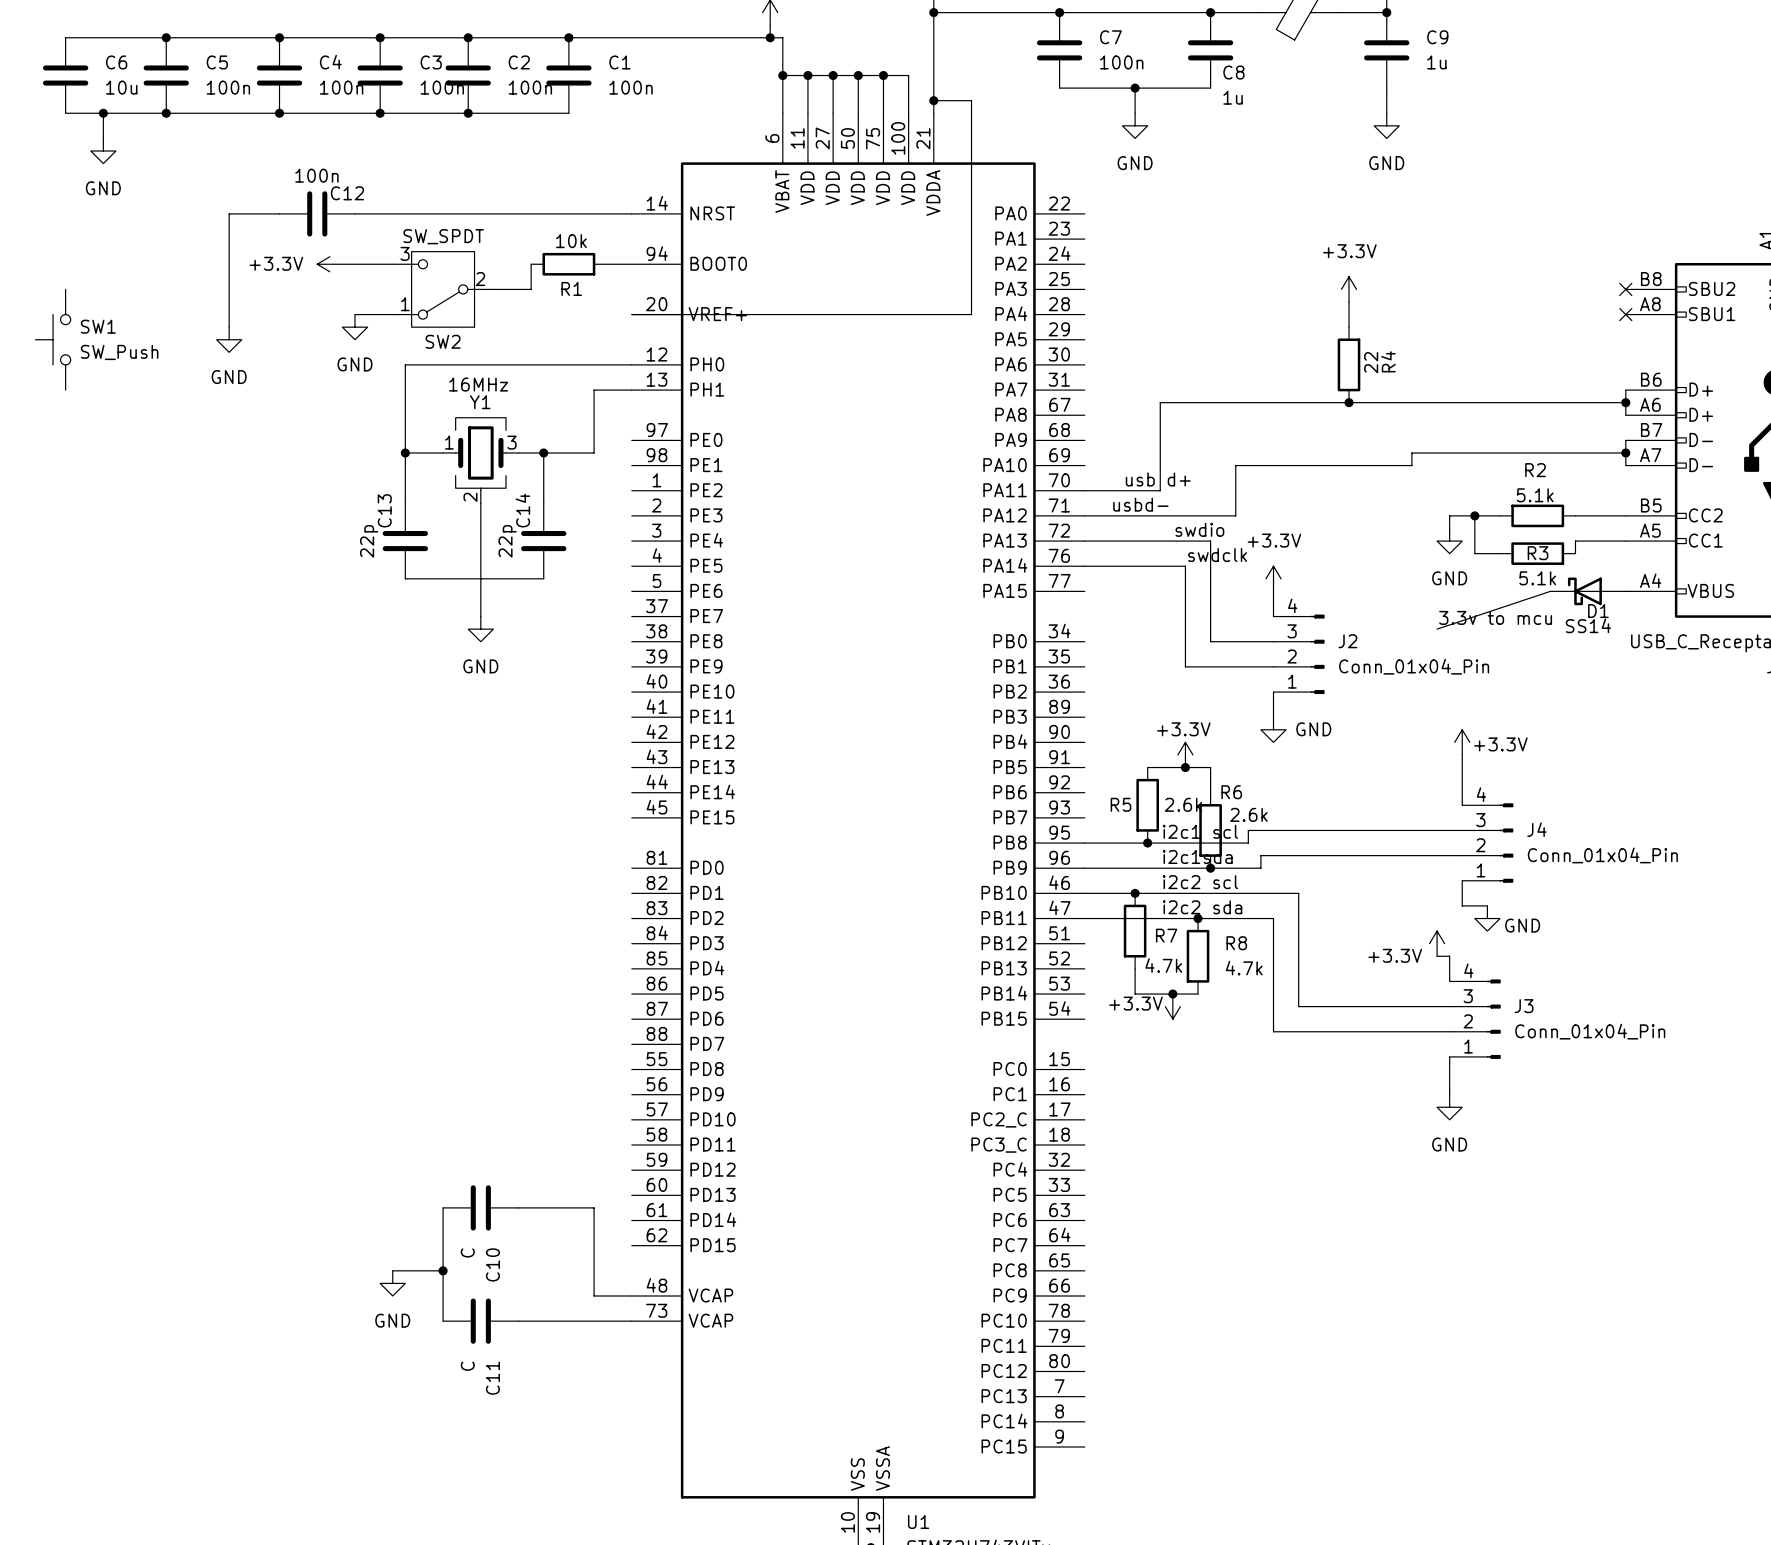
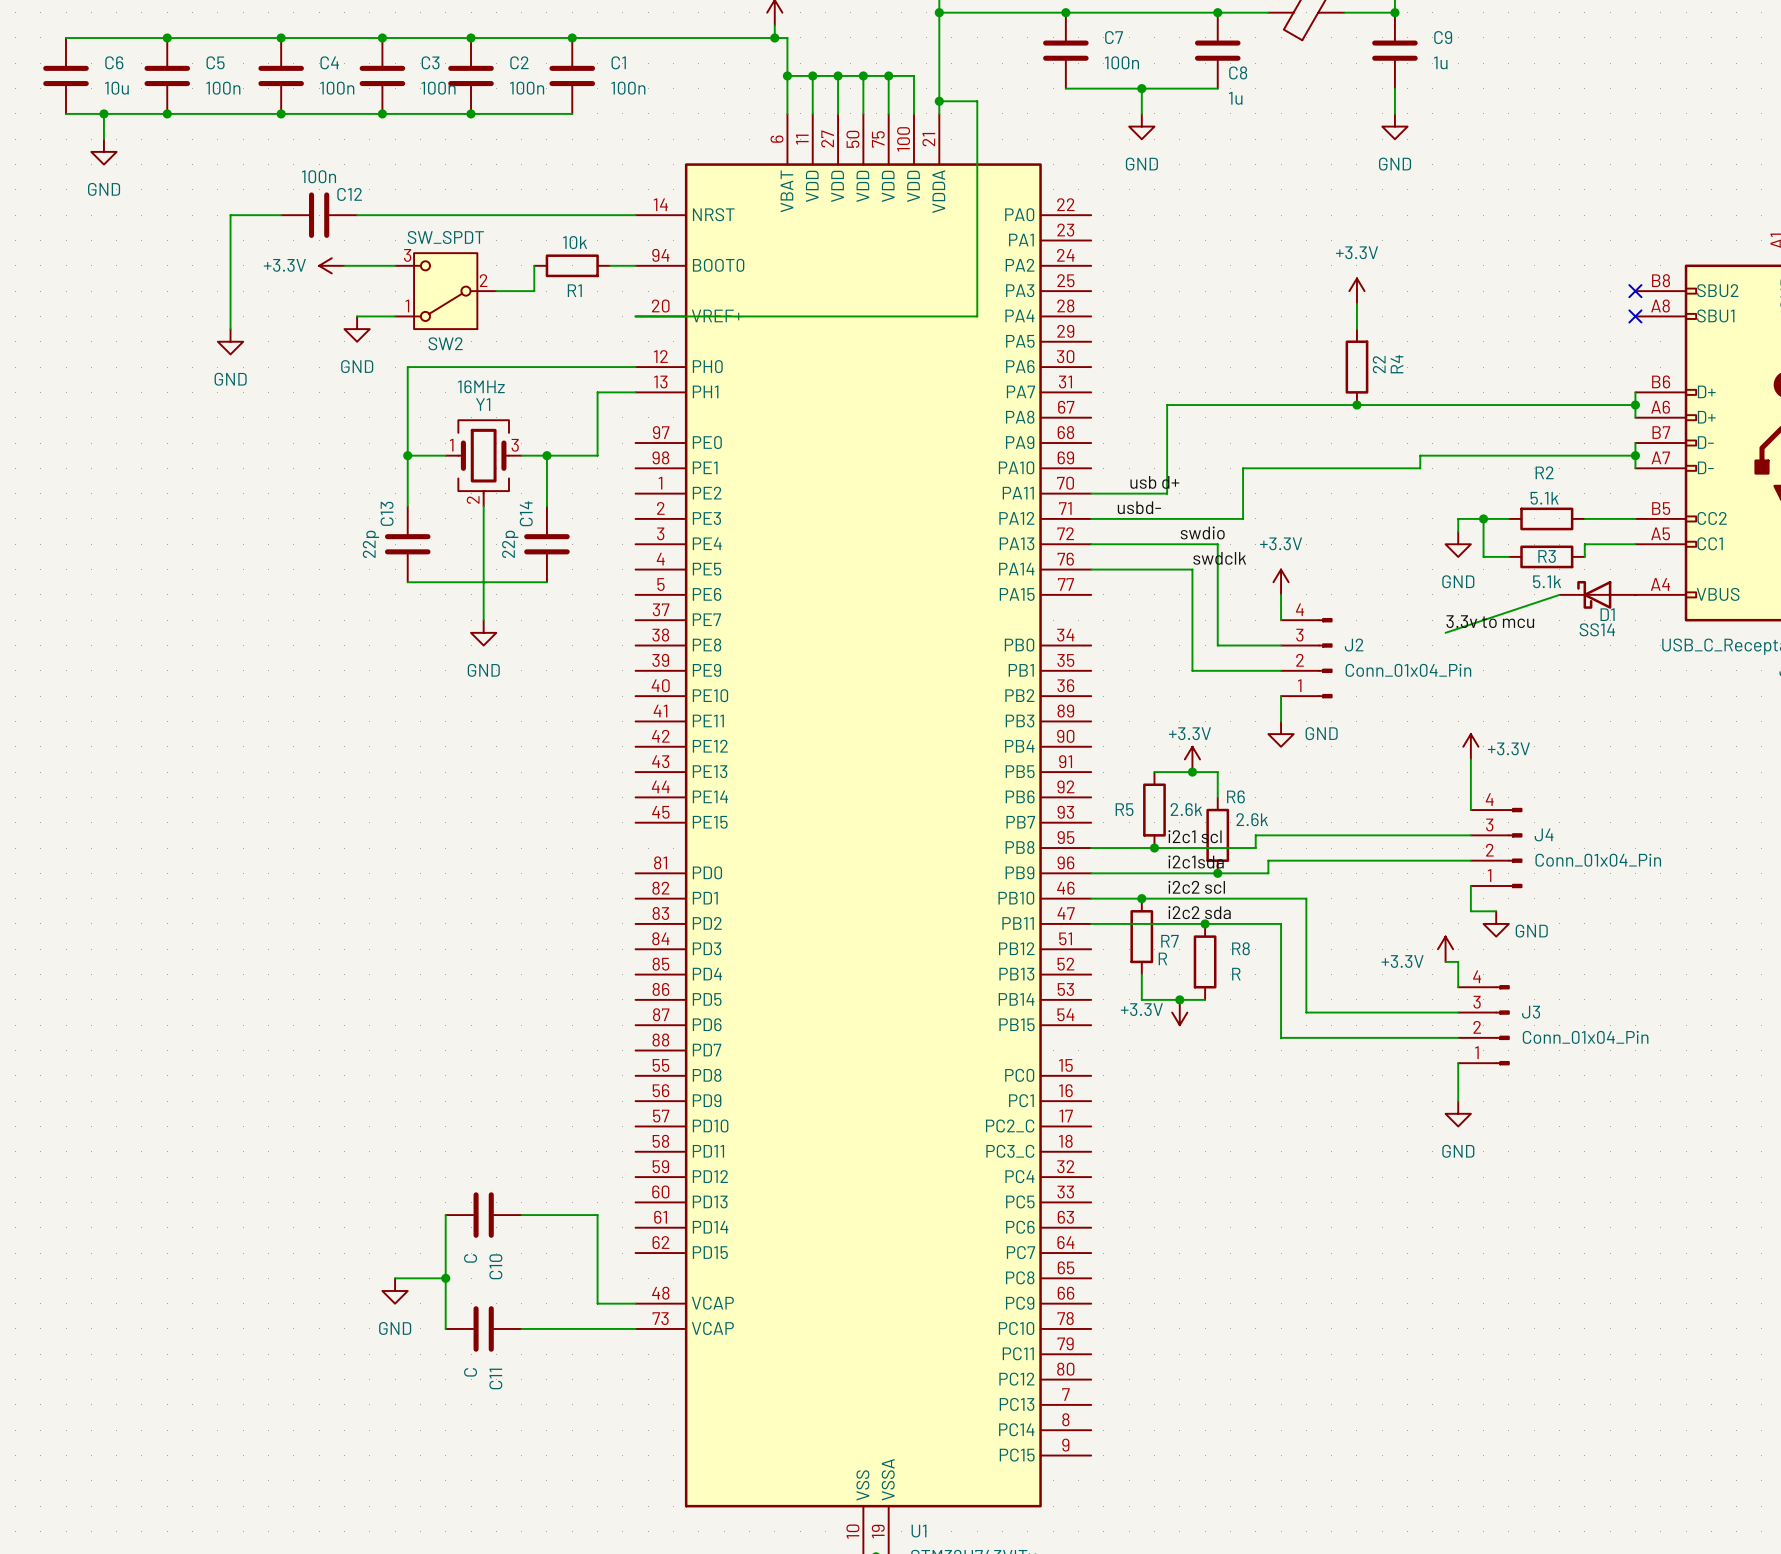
SW1: SW_Push (53, 339) -> none
R7 value: 4.7k (1163, 965) -> R (1162, 958)
R8 value: 4.7k (1244, 968) -> R (1236, 974)

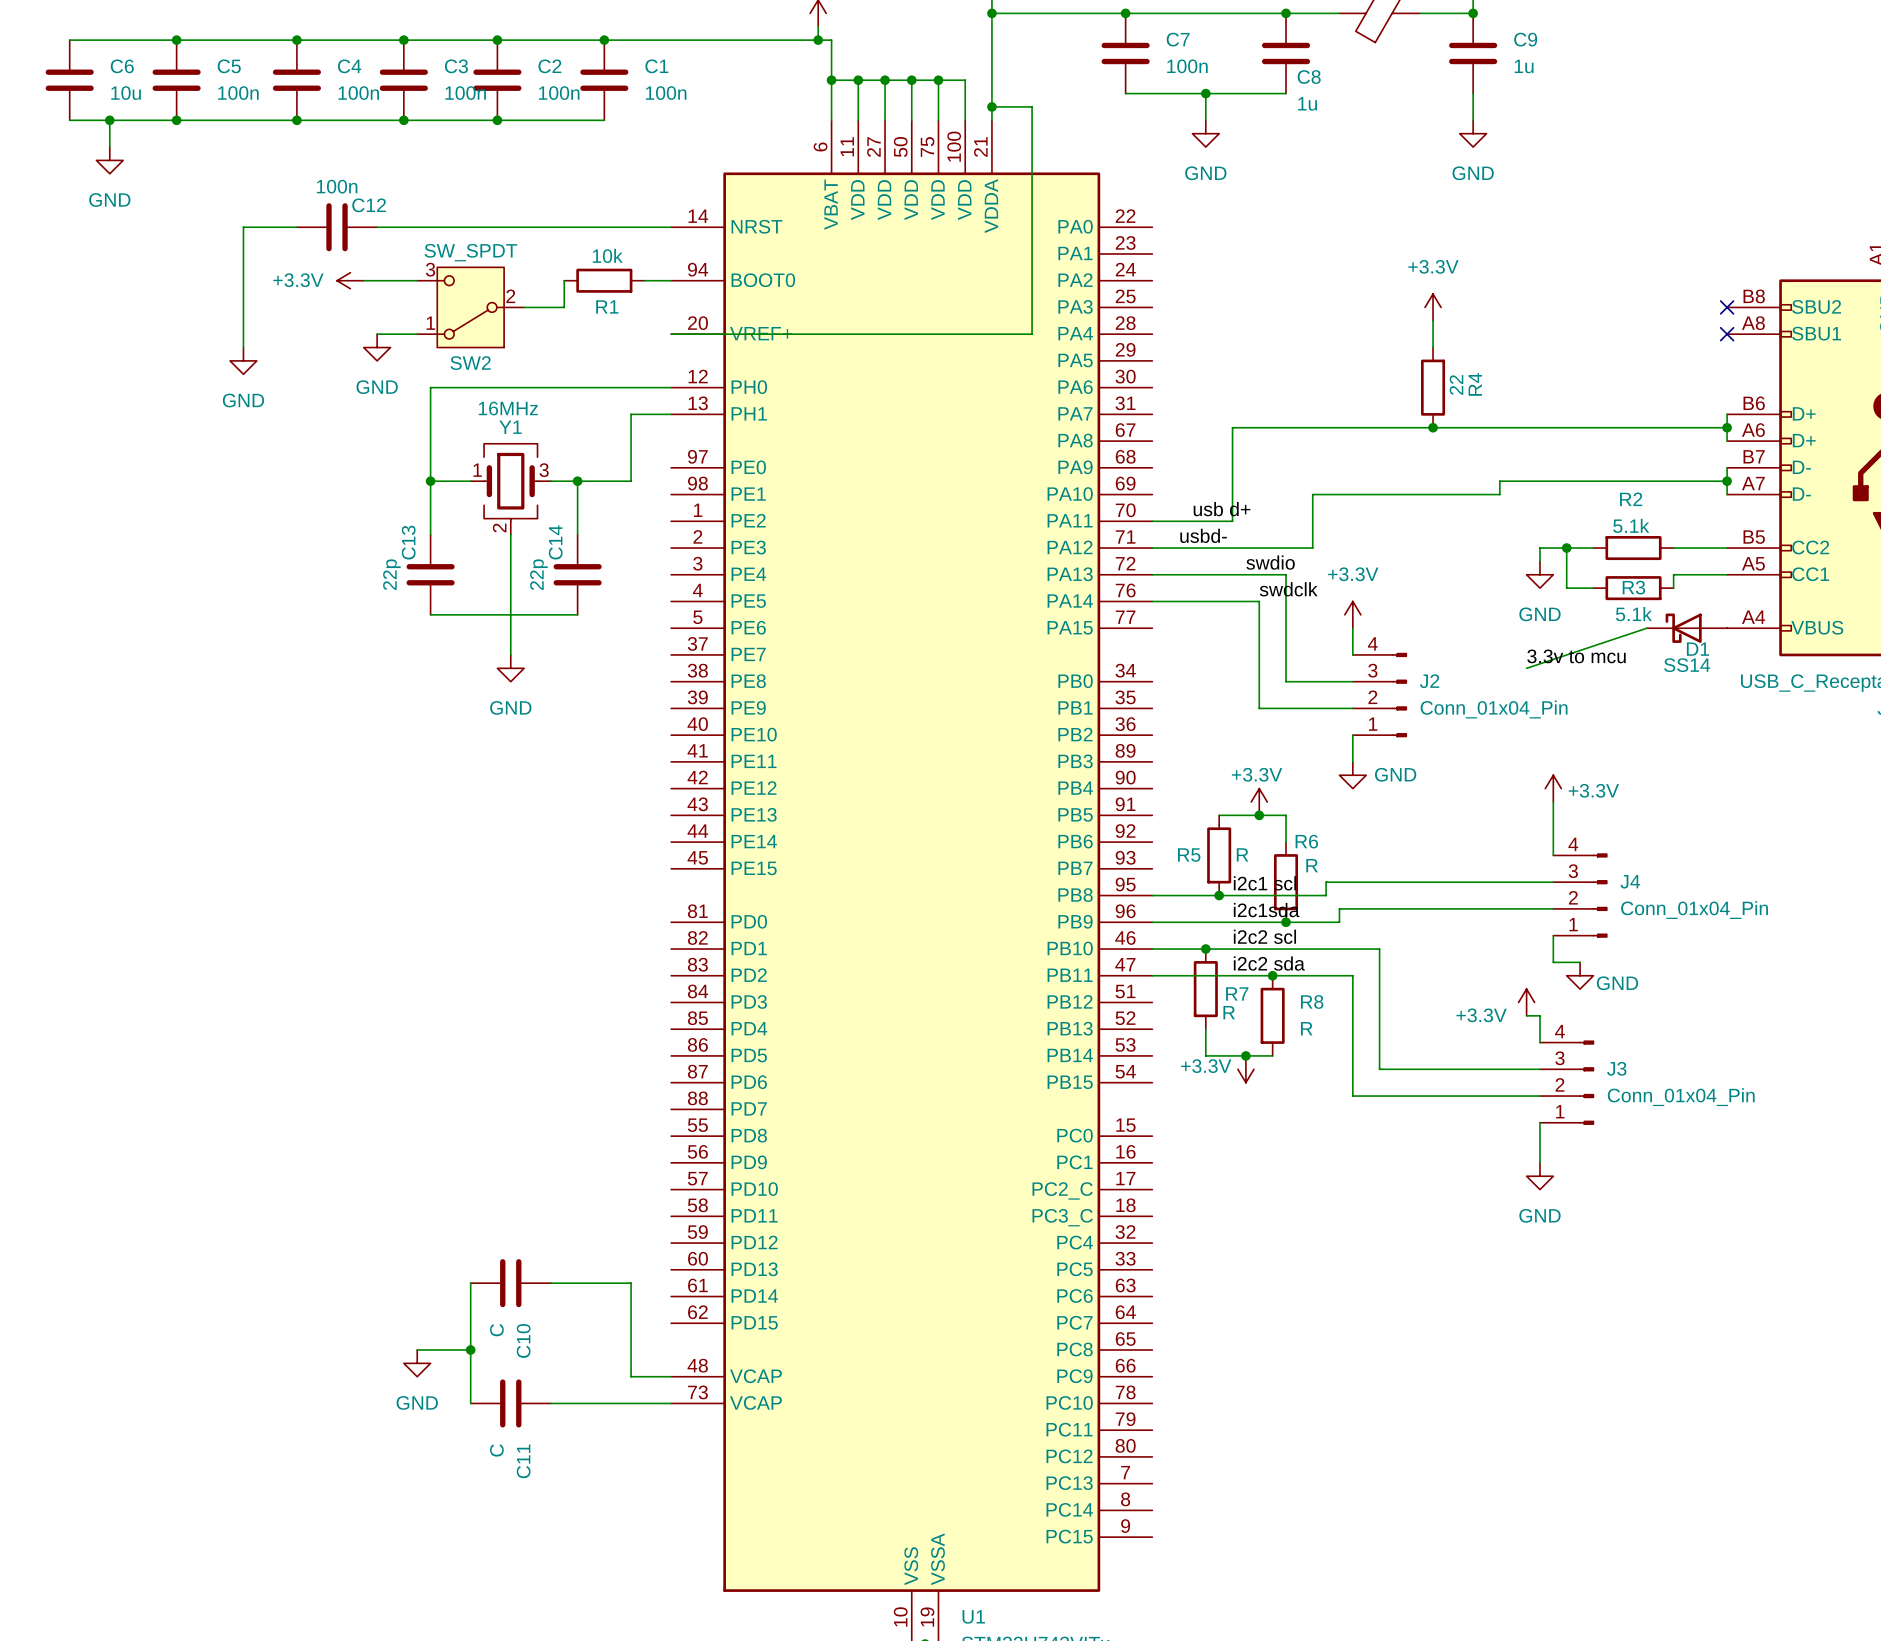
R5 value: 2.6k (1186, 809) -> R (1242, 854)
R6 value: 2.6k (1252, 819) -> R (1312, 865)

